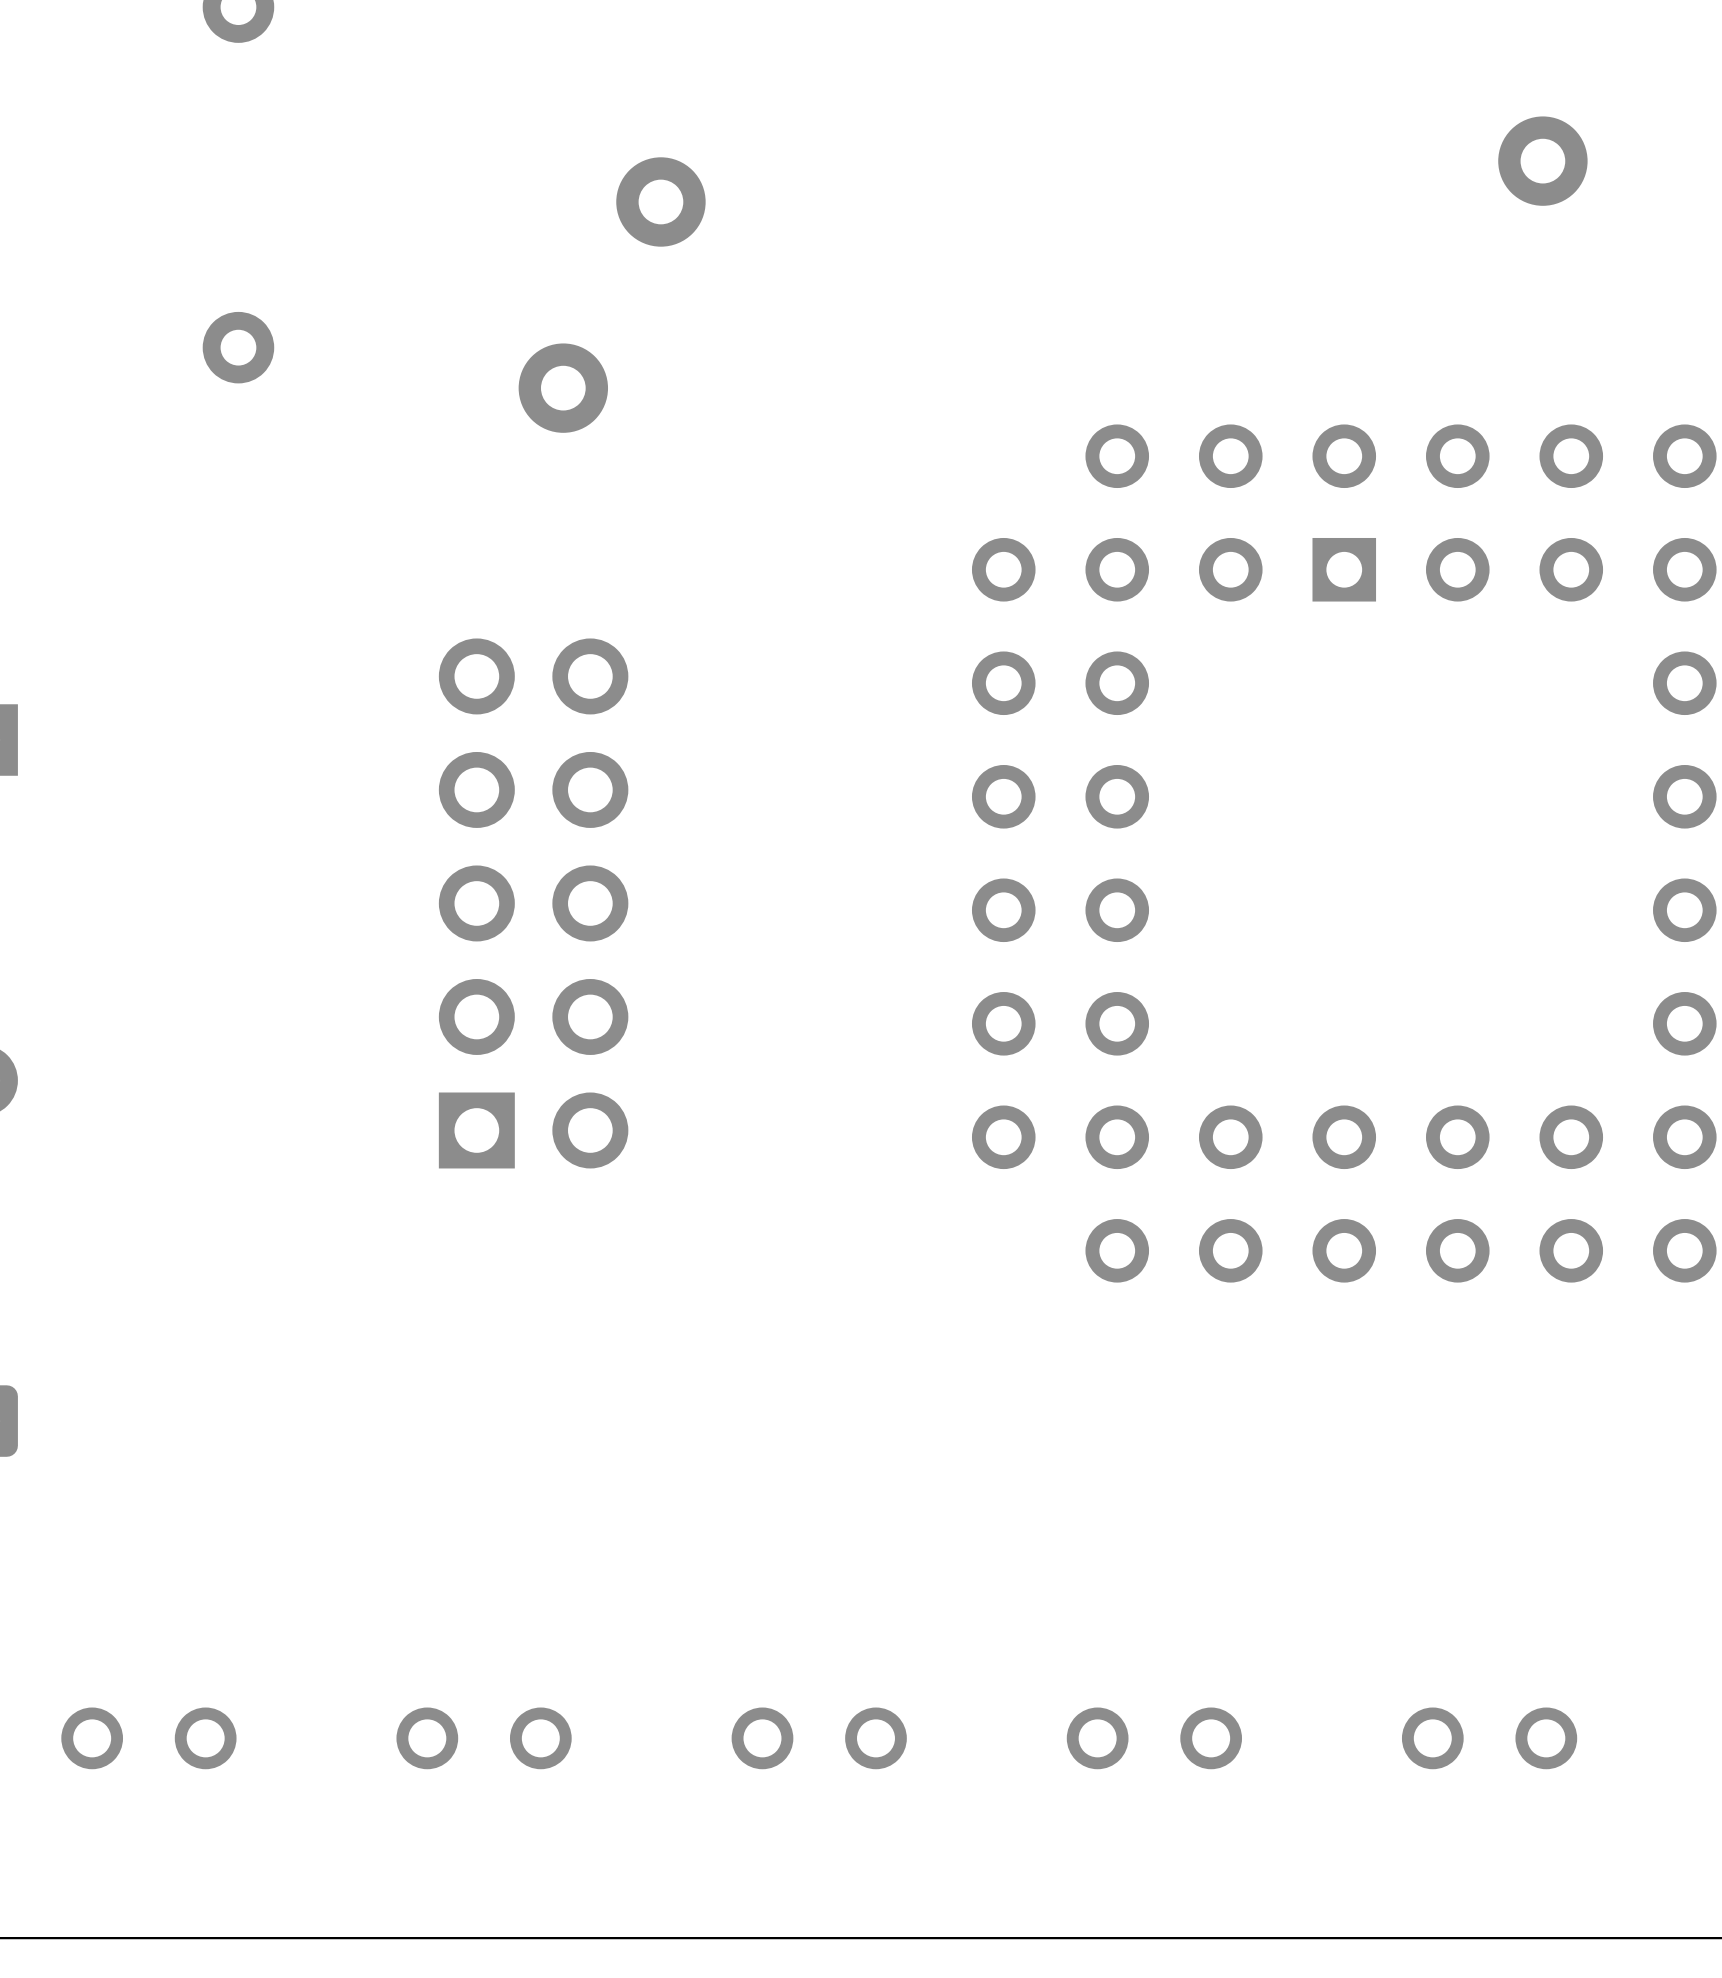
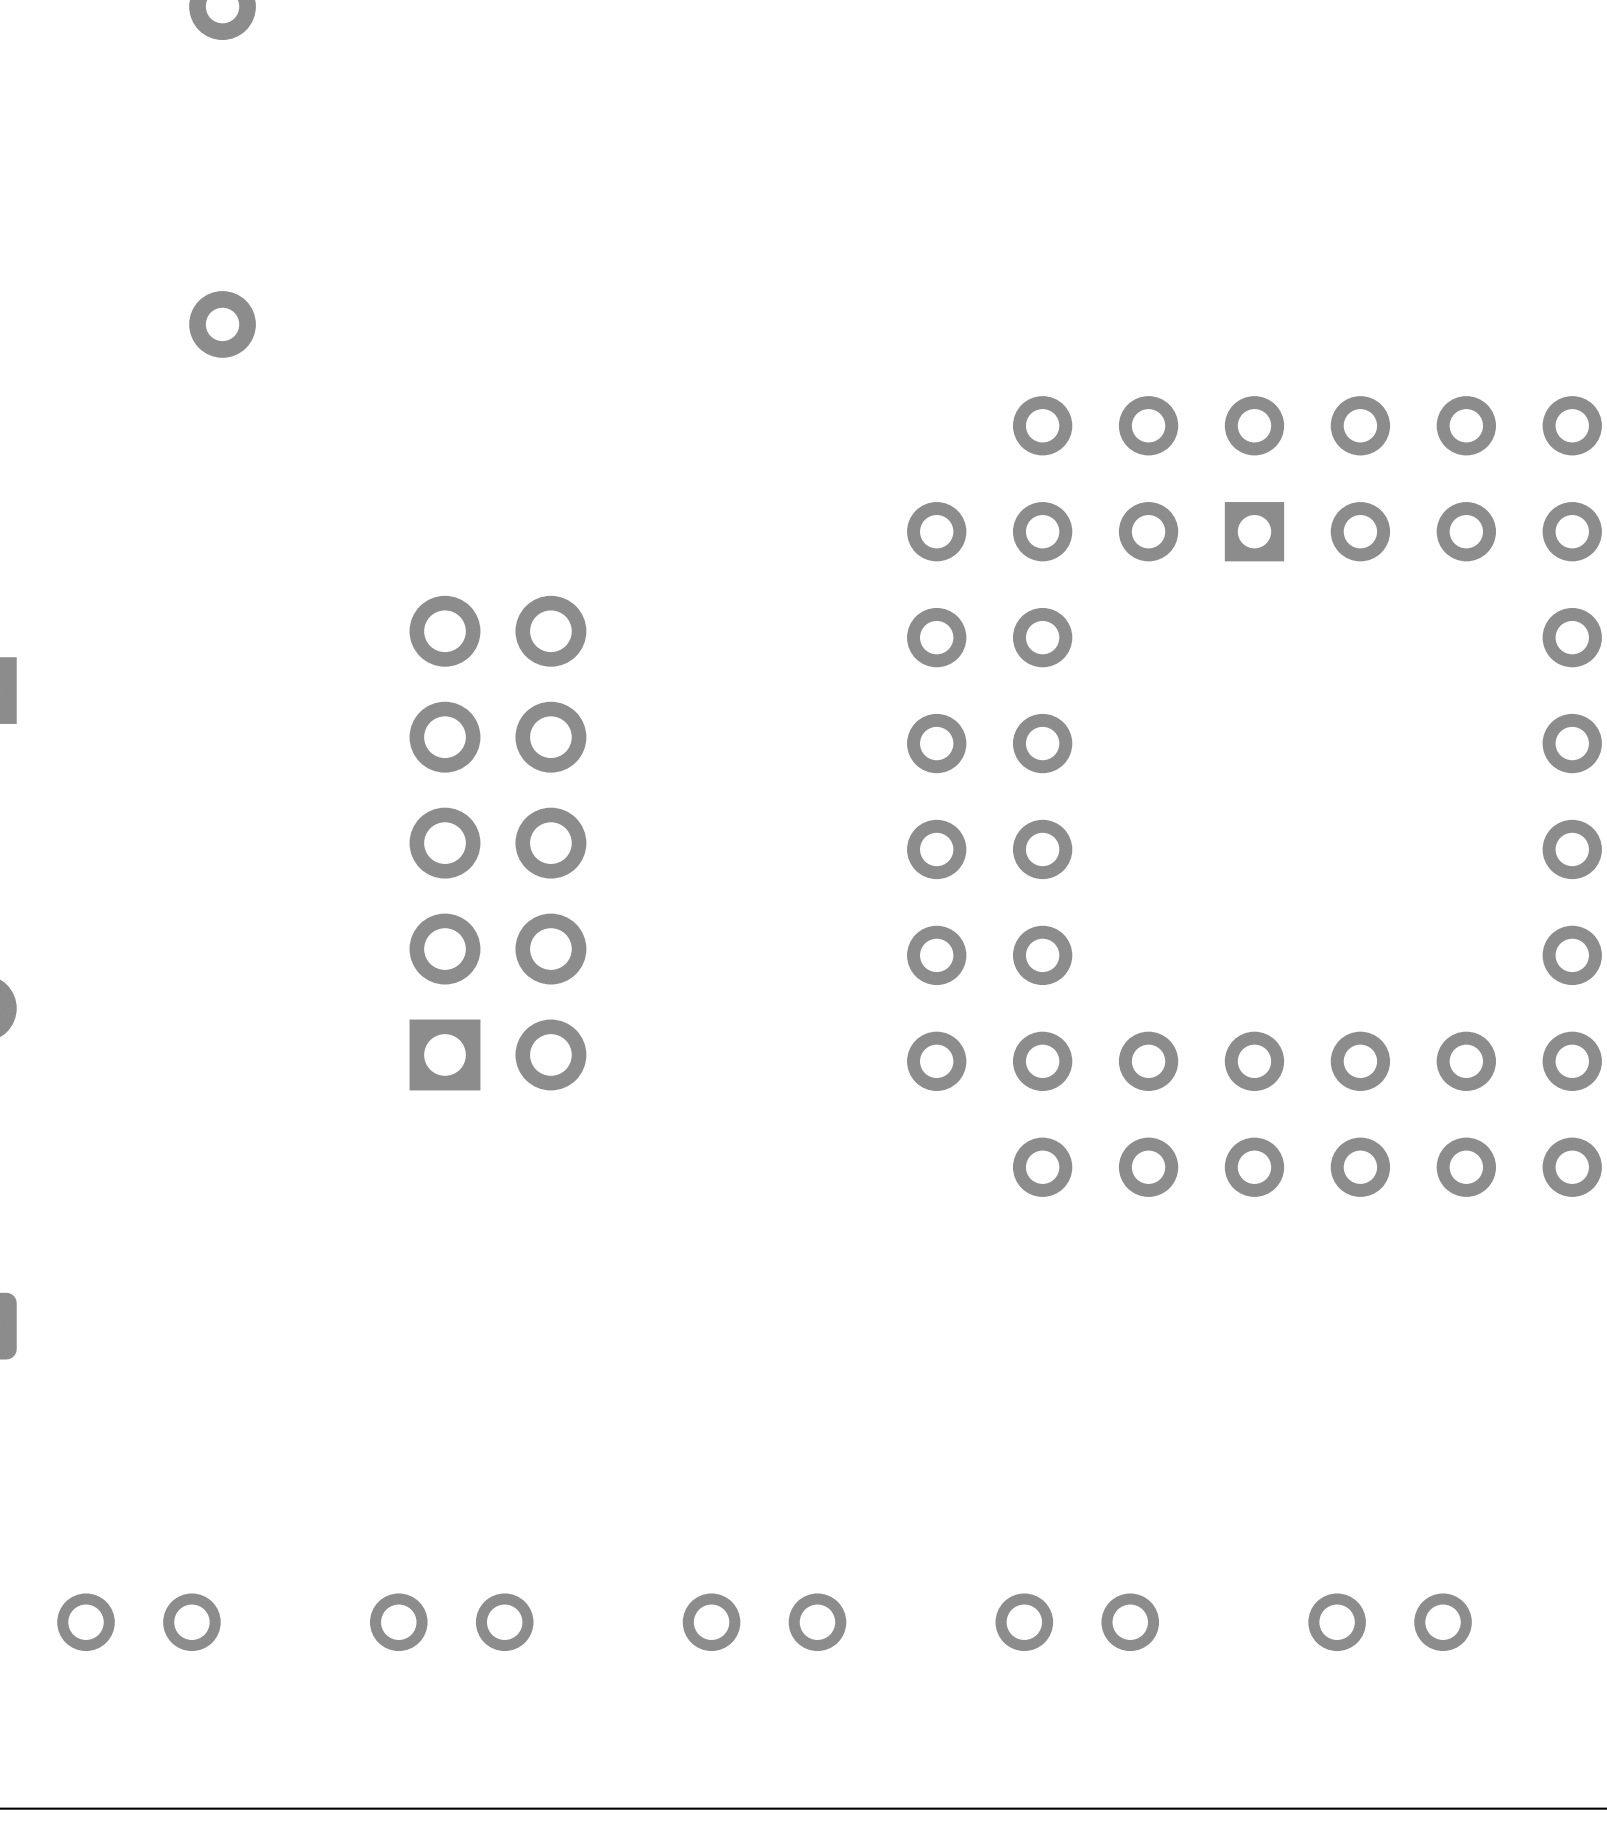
part: (1542, 161) -> none
part: (660, 201) -> none
part: (563, 388) -> none

